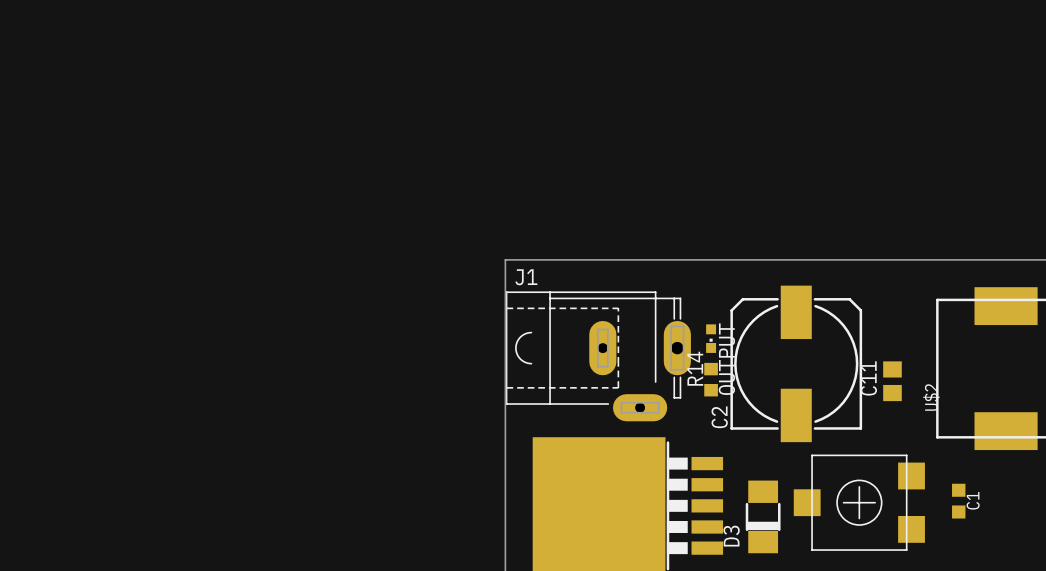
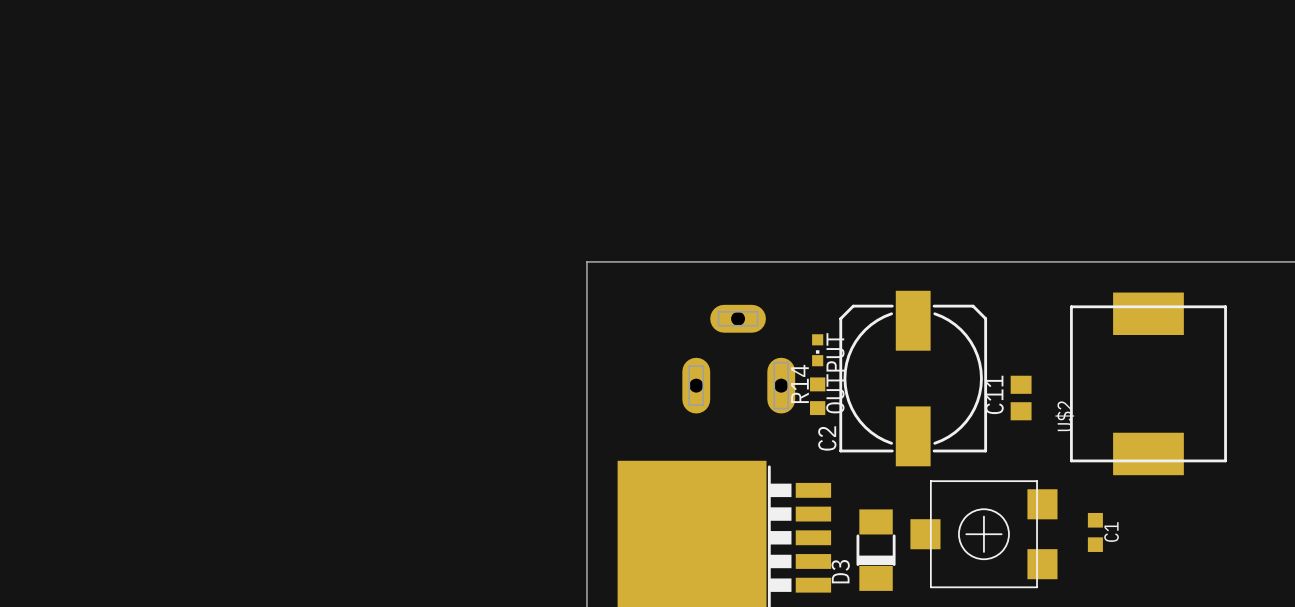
part: none -> (738, 359)
J1: (598, 356) -> none

